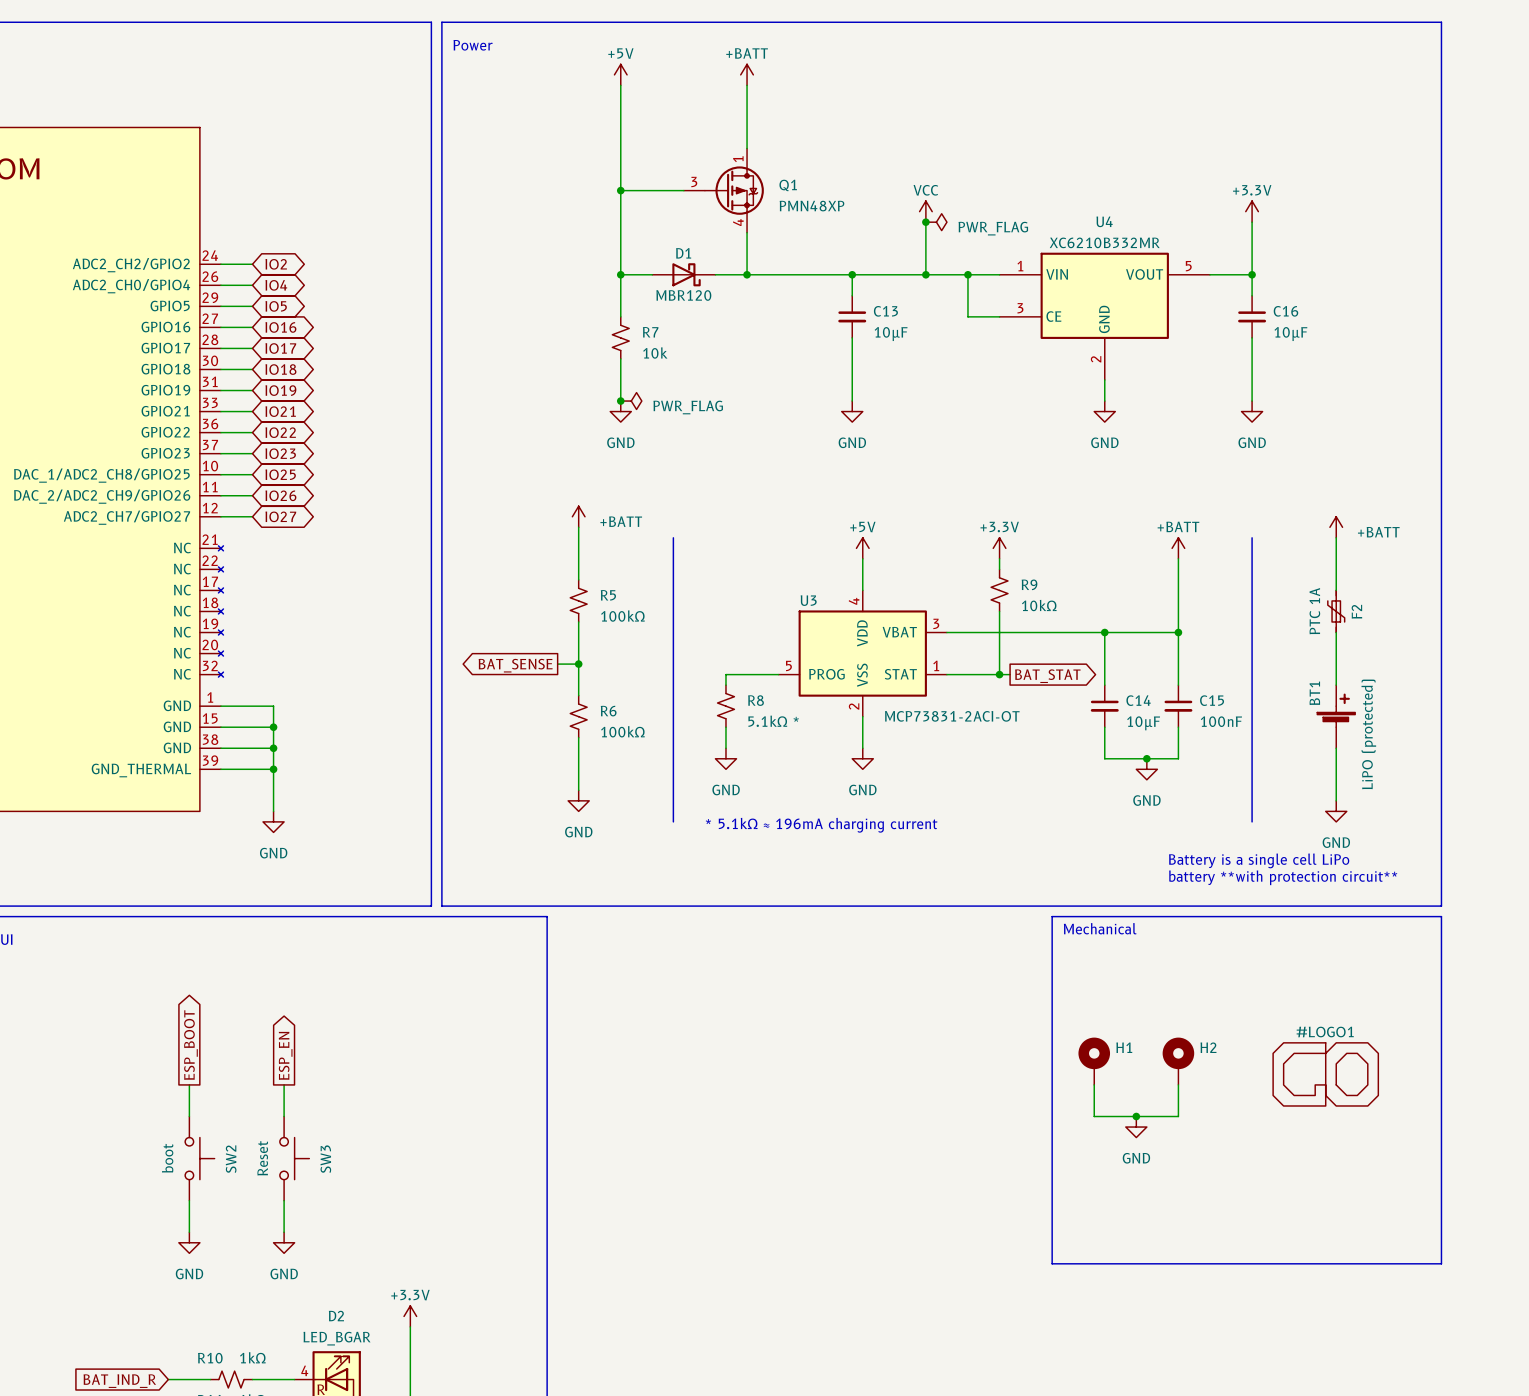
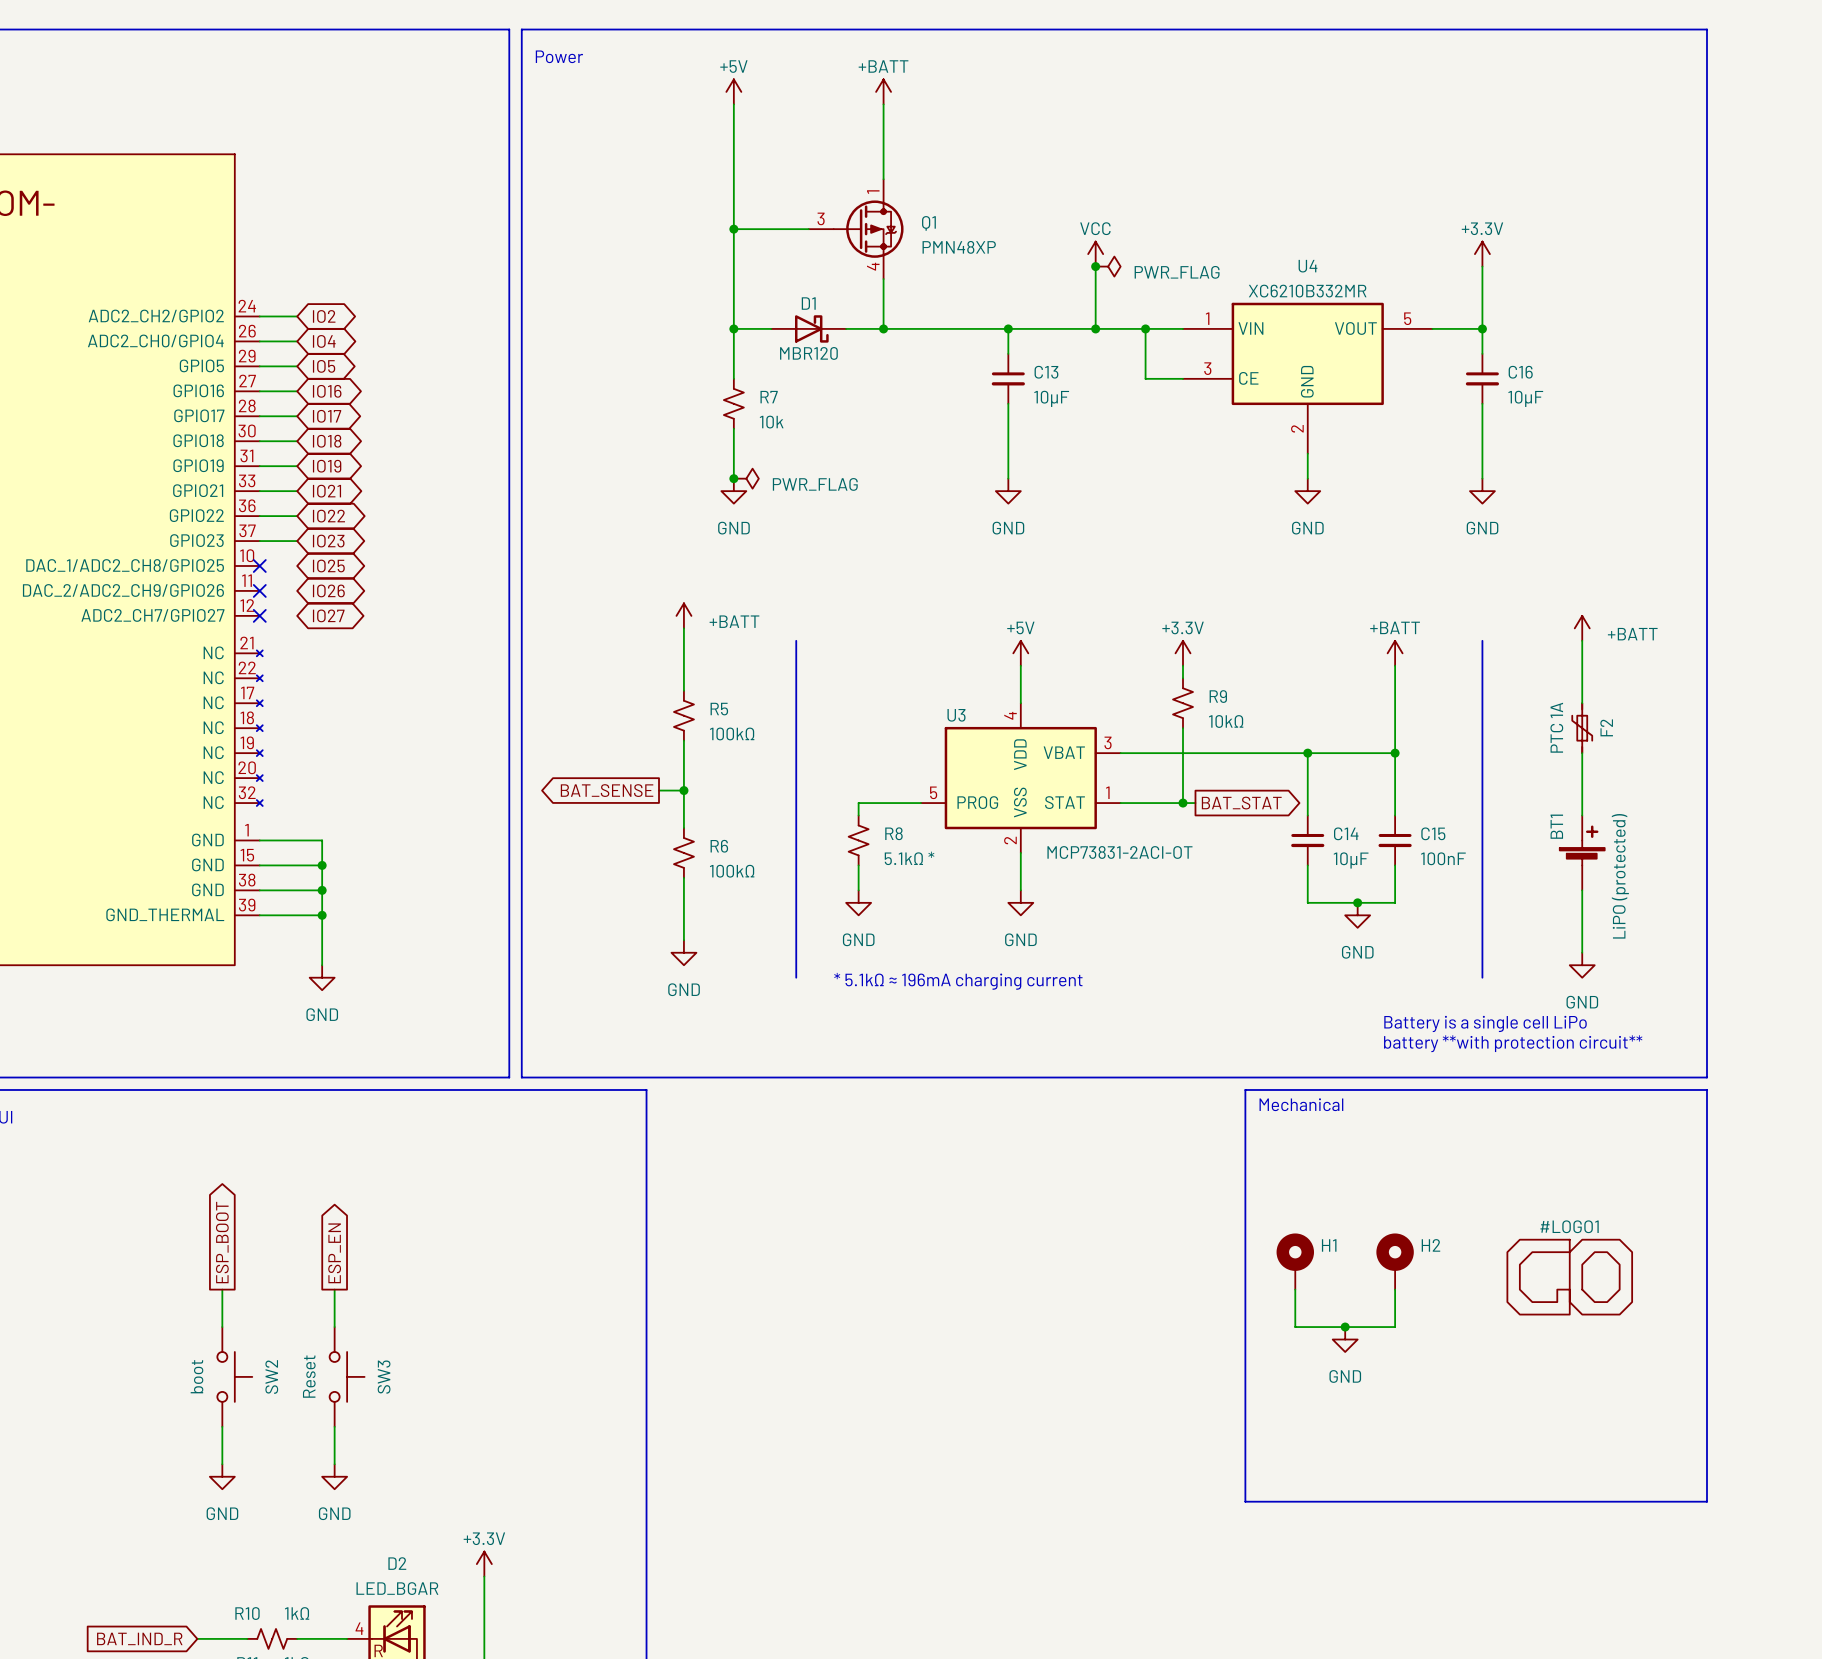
wire: (220, 474) (252, 474) -> none
no-connect mark: none -> (259, 565)
wire: (220, 495) (252, 495) -> none
no-connect mark: none -> (259, 590)
wire: (220, 516) (252, 516) -> none
no-connect mark: none -> (259, 615)

